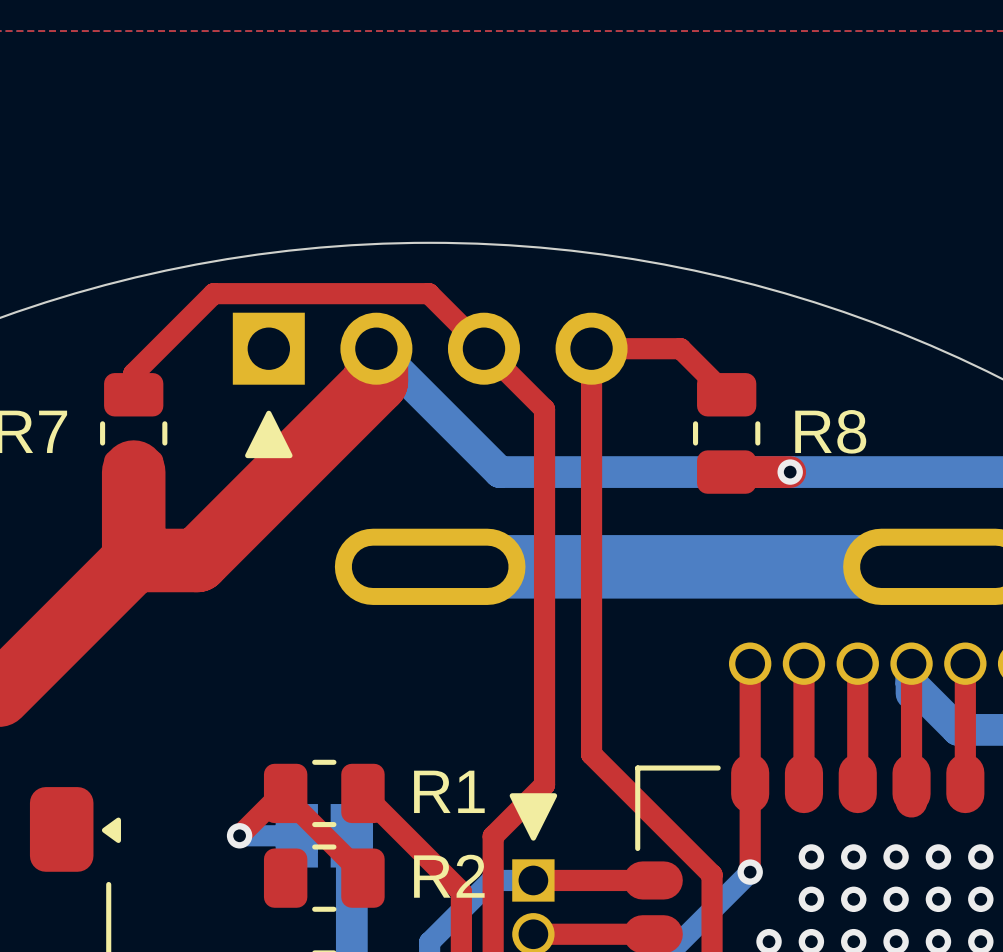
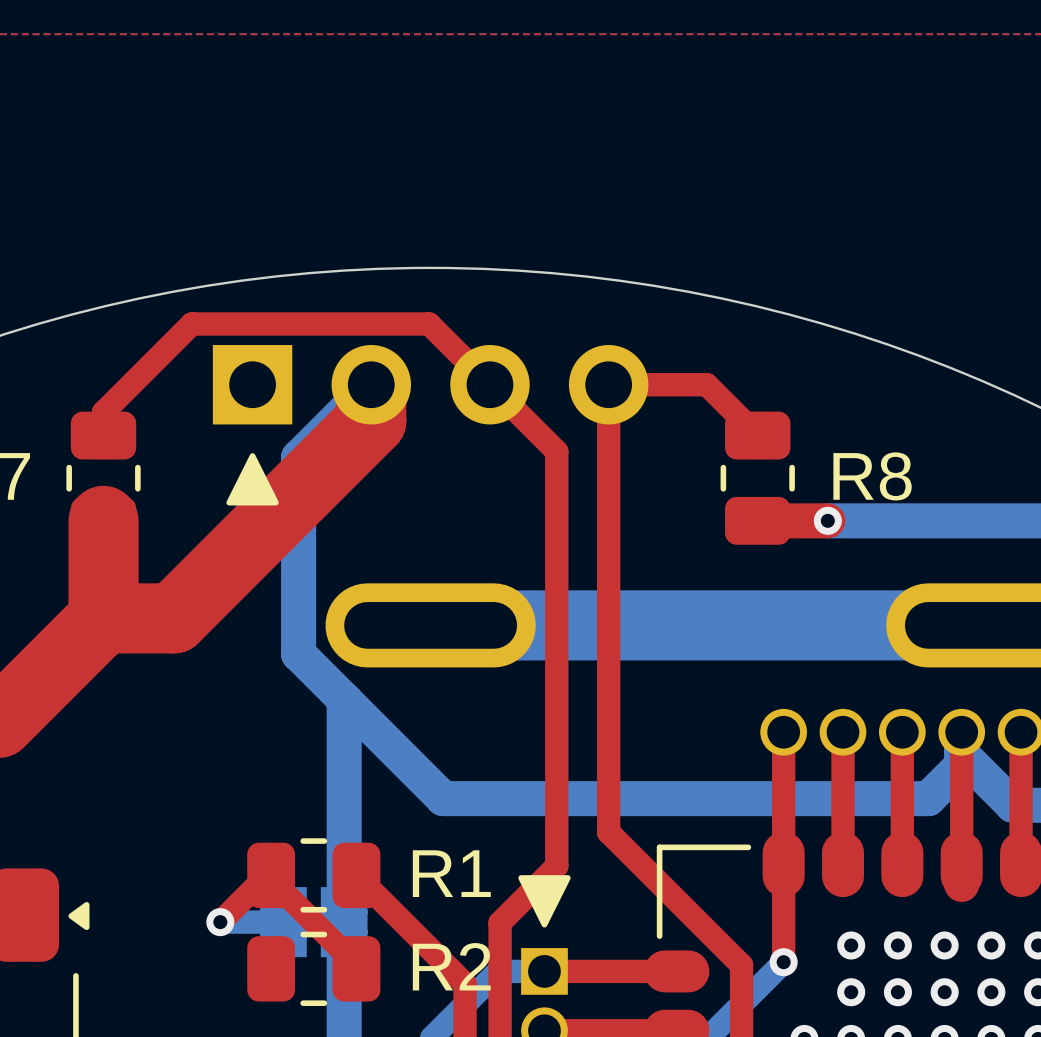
bottom track: (376, 348) (499, 472) (790, 472) -> (371, 384) (298, 457) (298, 653) (443, 798) (928, 798) (961, 765)
bottom track: none -> (344, 699) (344, 922)

